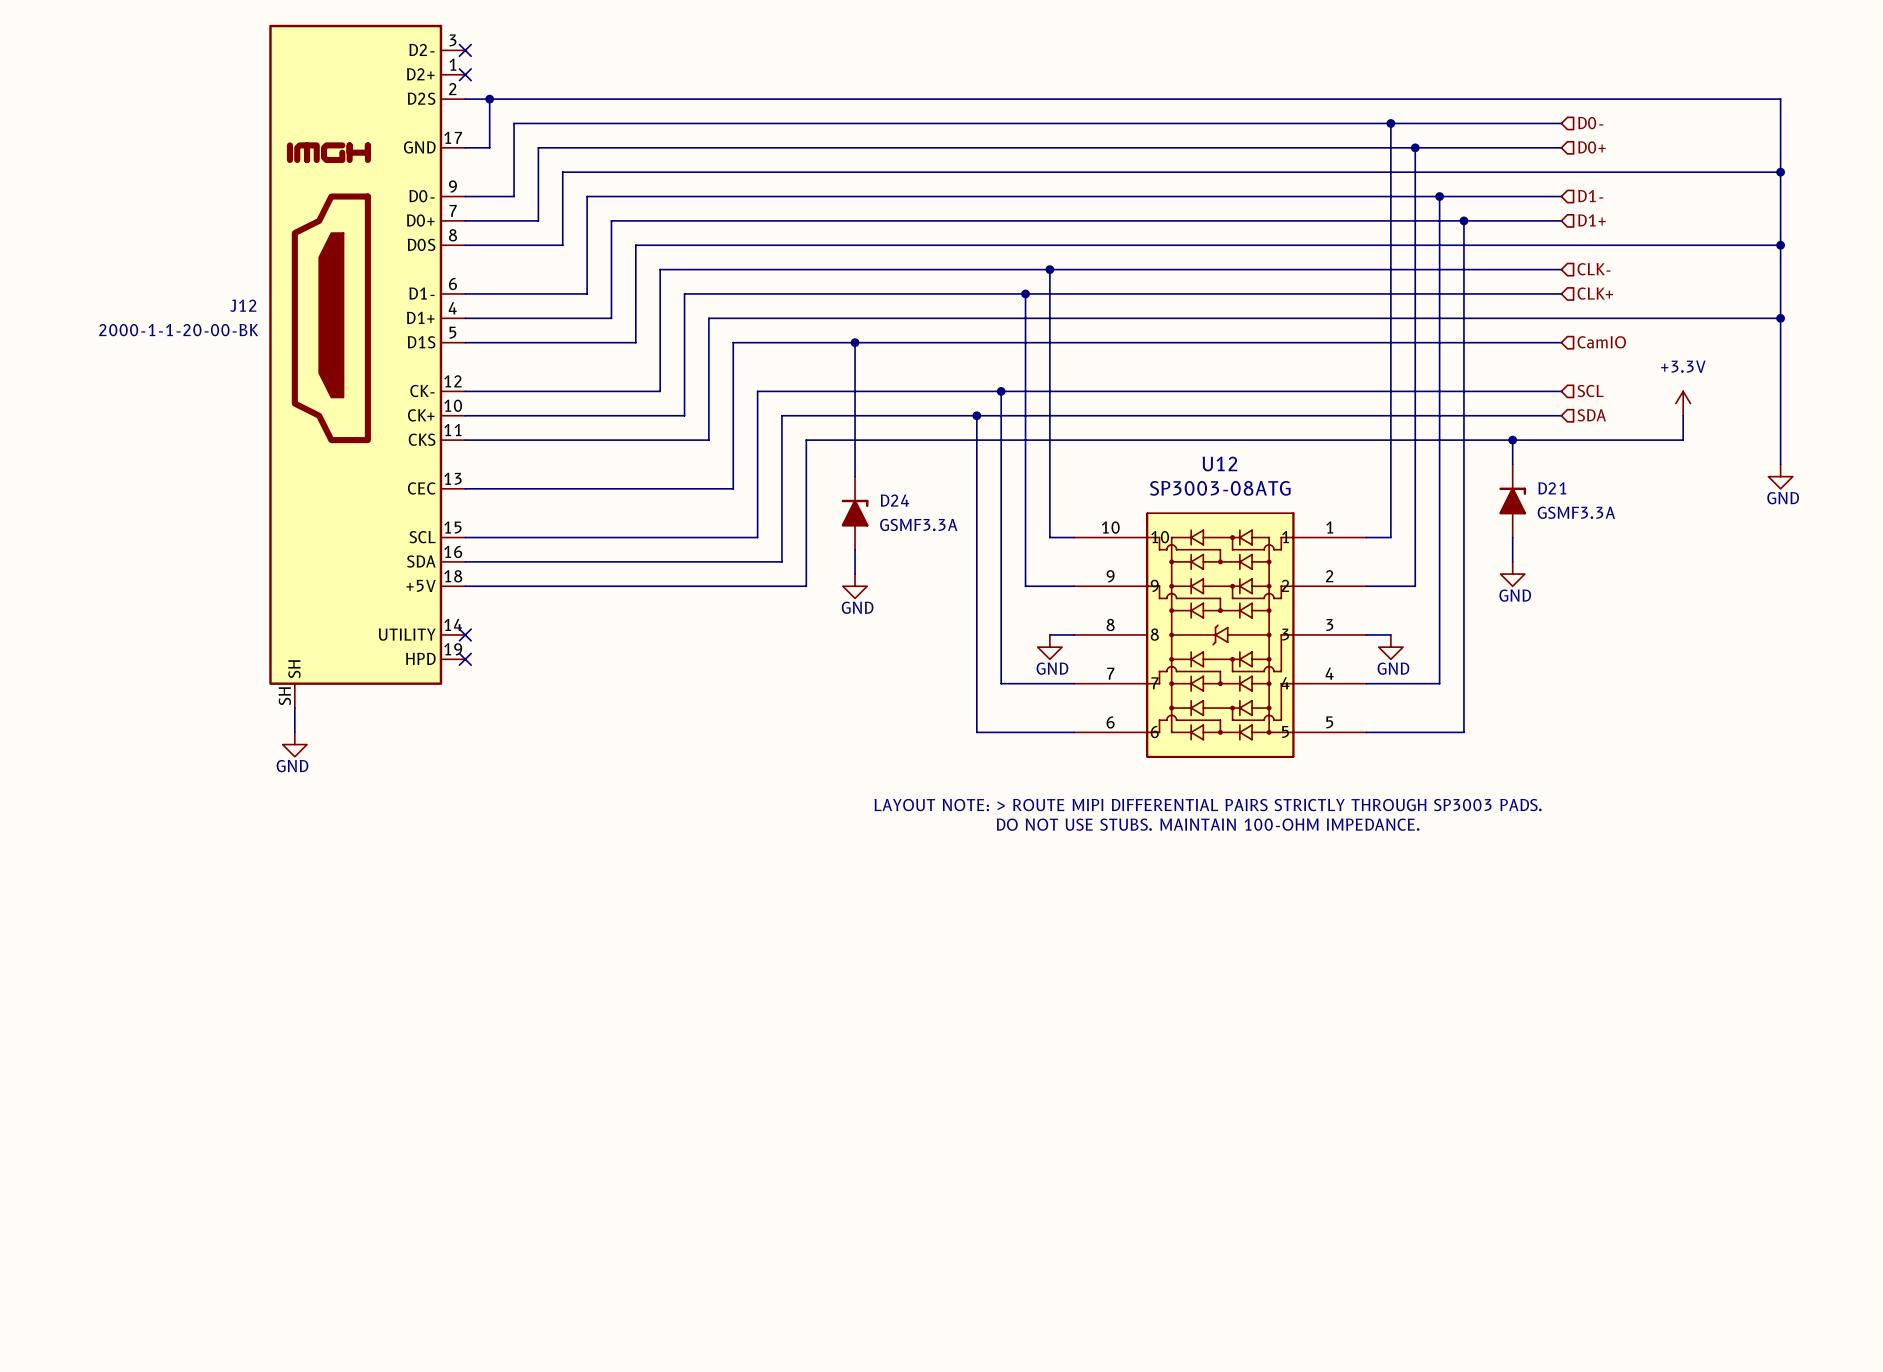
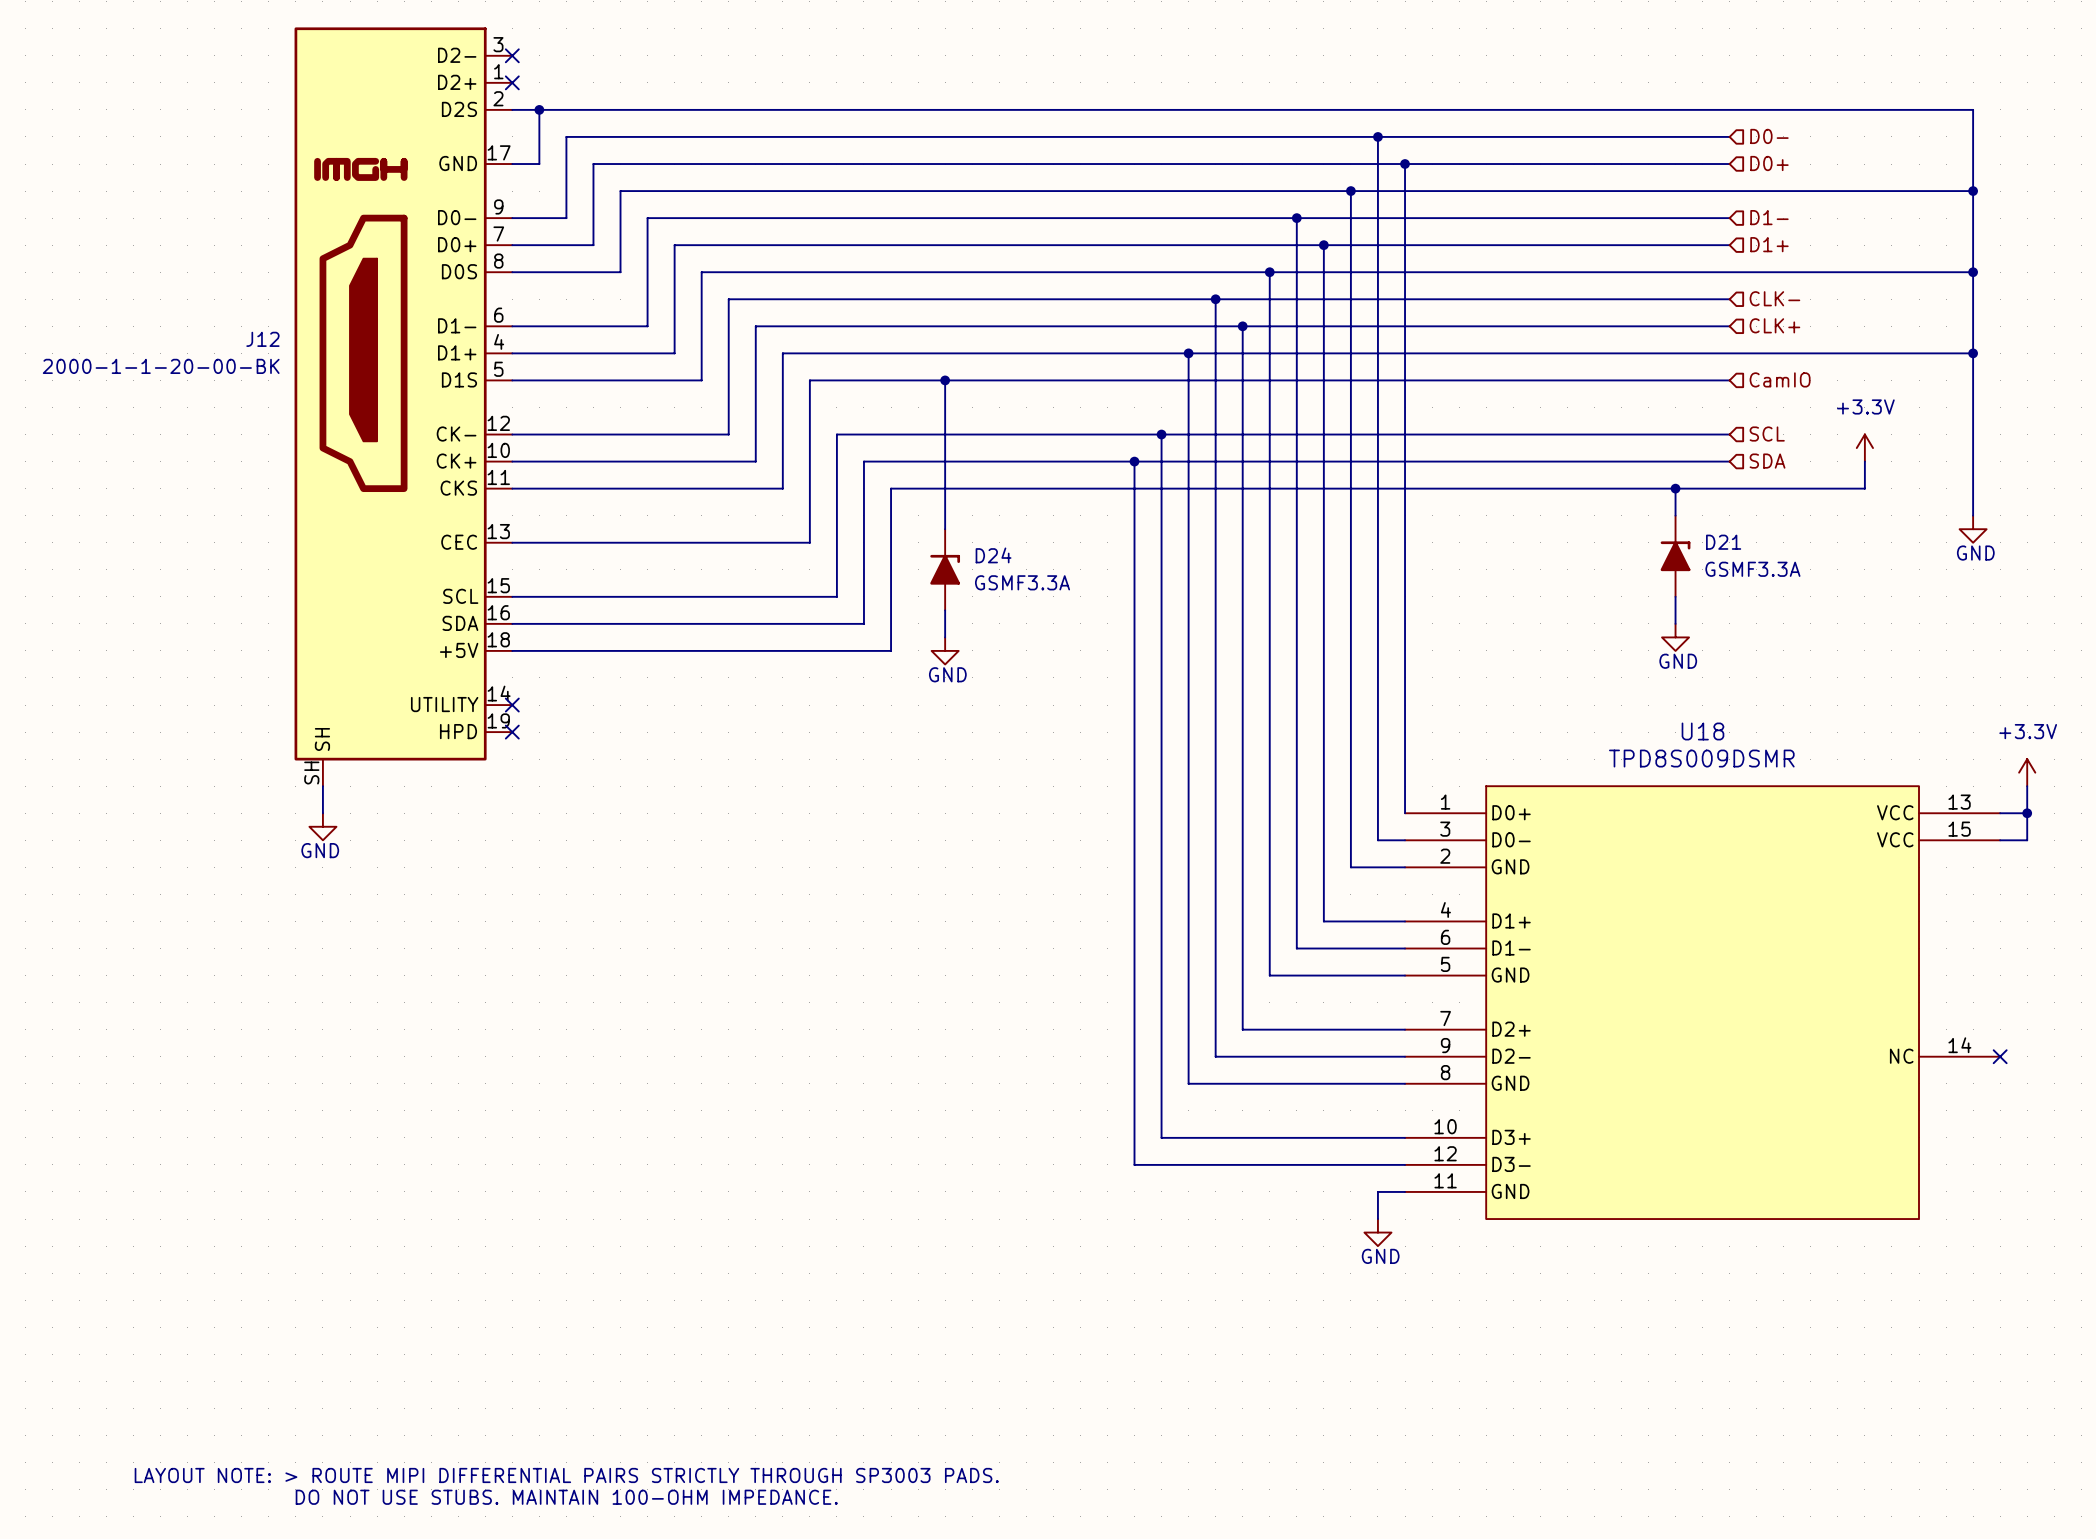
wire: none -> (1377, 136) (1377, 840) (1405, 840)
junction: none -> (1377, 136)
wire: (1390, 123) (1390, 537) (1366, 537) -> none
junction: (1390, 123) -> none
wire: none -> (1405, 164) (1405, 813)
junction: none -> (1405, 164)
wire: (1415, 147) (1415, 586) (1366, 586) -> none
junction: (1415, 147) -> none
wire: none -> (1350, 191) (1350, 867) (1405, 867)
junction: none -> (1350, 191)
wire: none -> (1296, 218) (1296, 948) (1405, 948)
junction: none -> (1296, 218)
wire: (1439, 196) (1439, 683) (1366, 683) -> none
junction: (1439, 196) -> none
wire: none -> (1323, 245) (1323, 921) (1405, 921)
junction: none -> (1323, 245)
wire: (1463, 220) (1463, 732) (1366, 732) -> none
junction: (1463, 220) -> none
wire: none -> (1269, 272) (1269, 975) (1405, 975)
junction: none -> (1269, 272)
wire: (1049, 269) (1049, 391) -> none
junction: (1049, 269) -> none
wire: none -> (1215, 299) (1215, 1056) (1405, 1056)
junction: none -> (1215, 299)
wire: (1025, 293) (1025, 415) -> none
junction: (1025, 293) -> none
wire: none -> (1242, 326) (1242, 1029) (1405, 1029)
junction: none -> (1242, 326)
wire: none -> (1188, 353) (1188, 1083) (1405, 1083)
junction: none -> (1188, 353)
wire: (1001, 391) (1001, 683) (1074, 683) -> none
junction: (1001, 391) -> none
junction: none -> (1161, 434)
wire: (976, 415) (976, 732) (1074, 732) -> none
junction: (976, 415) -> none
junction: none -> (1134, 461)
wire: (1049, 537) (1074, 537) -> (1161, 596) (1161, 1137) (1405, 1137)
wire: (1025, 586) (1074, 586) -> (1134, 650) (1134, 1164) (1405, 1164)
wire: (1049, 634) (1074, 634) -> none
U12: SP3003-08ATG (1220, 634) -> none
wire: (1366, 634) (1390, 634) -> none
power symbol: GND (1049, 647) -> none
power symbol: GND (1390, 647) -> none
power symbol: none -> +3.3V (2027, 772)
wire: none -> (2027, 786) (2027, 840) (2000, 840)
wire: none -> (2000, 813) (2027, 813)
junction: none -> (2027, 813)
text: LAYOUT NOTE: > ROUTE MIPI DIFFERENTIAL PAIRS STRICTLY THROUGH SP3003 PADS. (1208, 805) -> none
text: DO NOT USE STUBS. MAINTAIN 100-OHM IMPEDANCE. (1208, 824) -> none
U18: none -> TPD8S009DSMR (1702, 1002)
no-connect mark: none -> (2000, 1056)
wire: none -> (1405, 1191) (1377, 1191) (1377, 1219)
power symbol: none -> GND (1377, 1232)
text: none -> LAYOUT NOTE: > ROUTE MIPI DIFFERENTIAL PAIRS STRICTLY THROUGH SP3003 PADS. (566, 1475)
text: none -> DO NOT USE STUBS. MAINTAIN 100-OHM IMPEDANCE. (566, 1497)

